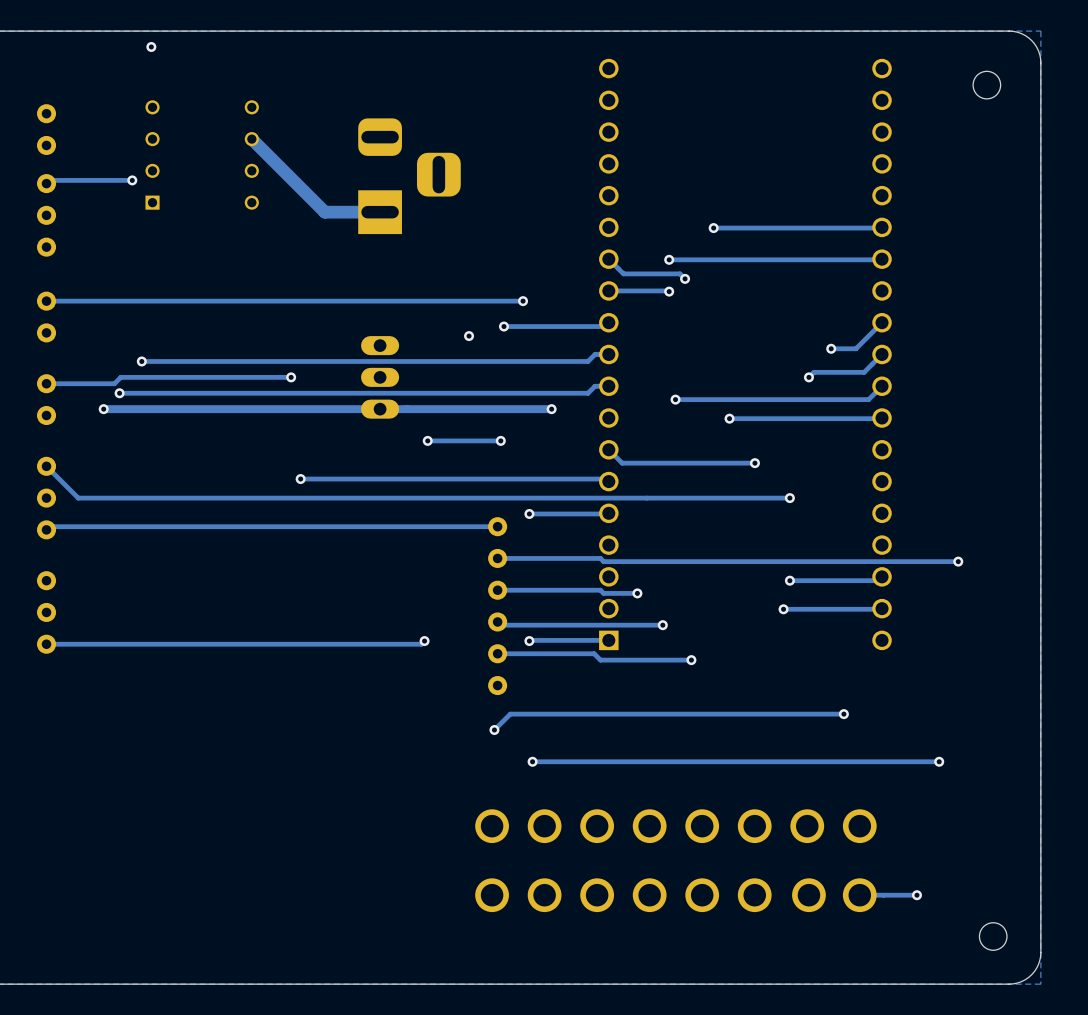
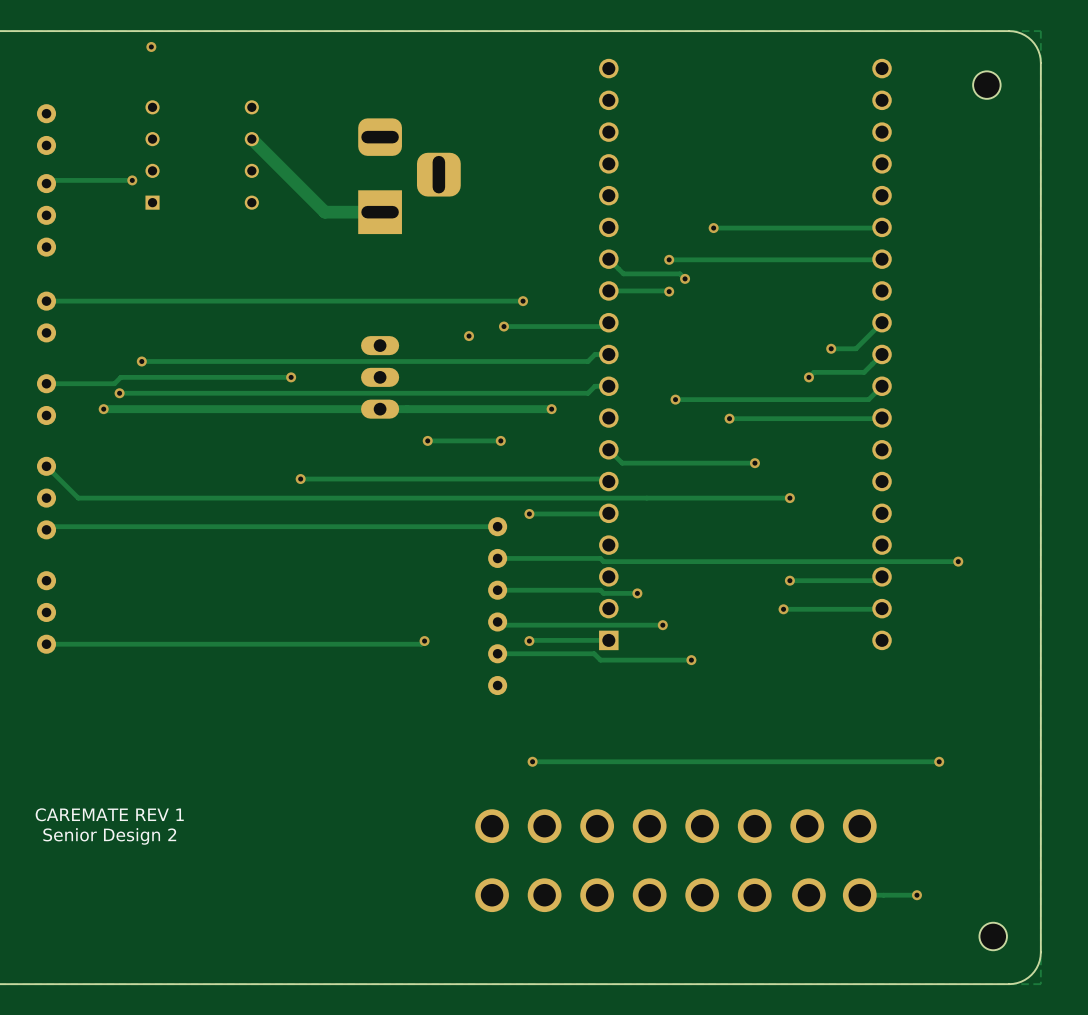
track: (843, 714) (510, 714) (494, 730) -> none
via: (843, 714) -> none
via: (494, 730) -> none
text: none -> CAREMATE REV 1 (109, 814)
text: none -> Senior Design 2 (109, 836)

